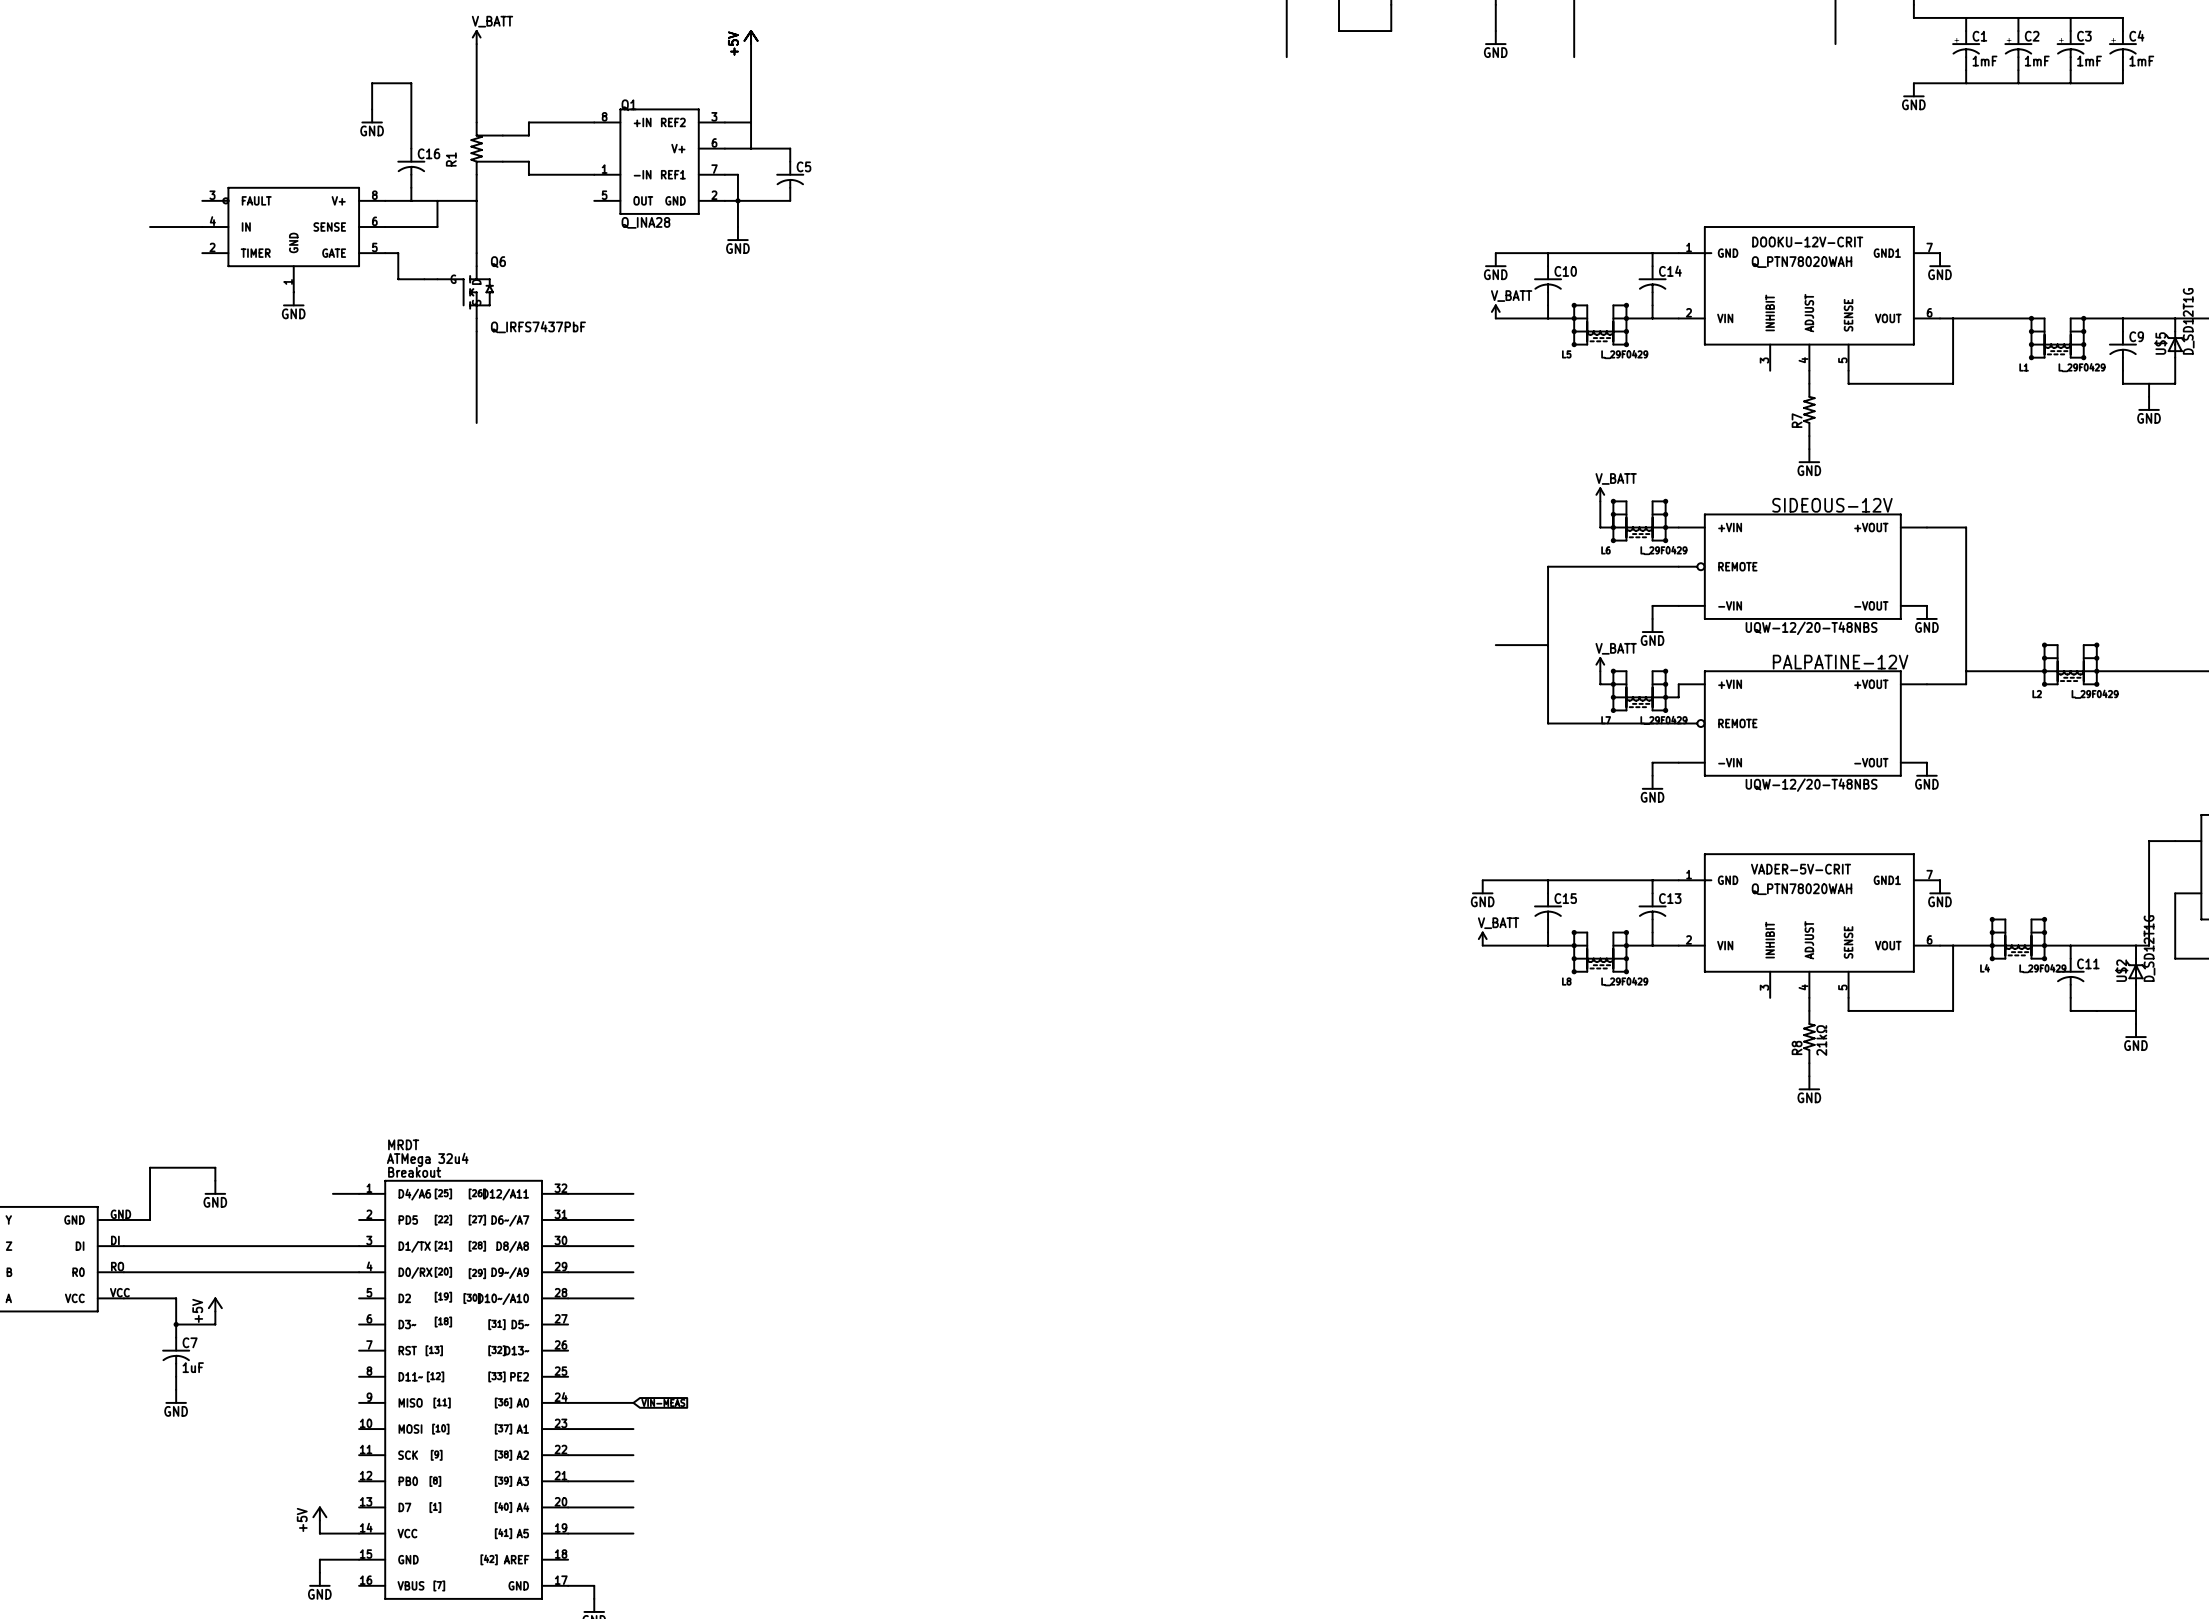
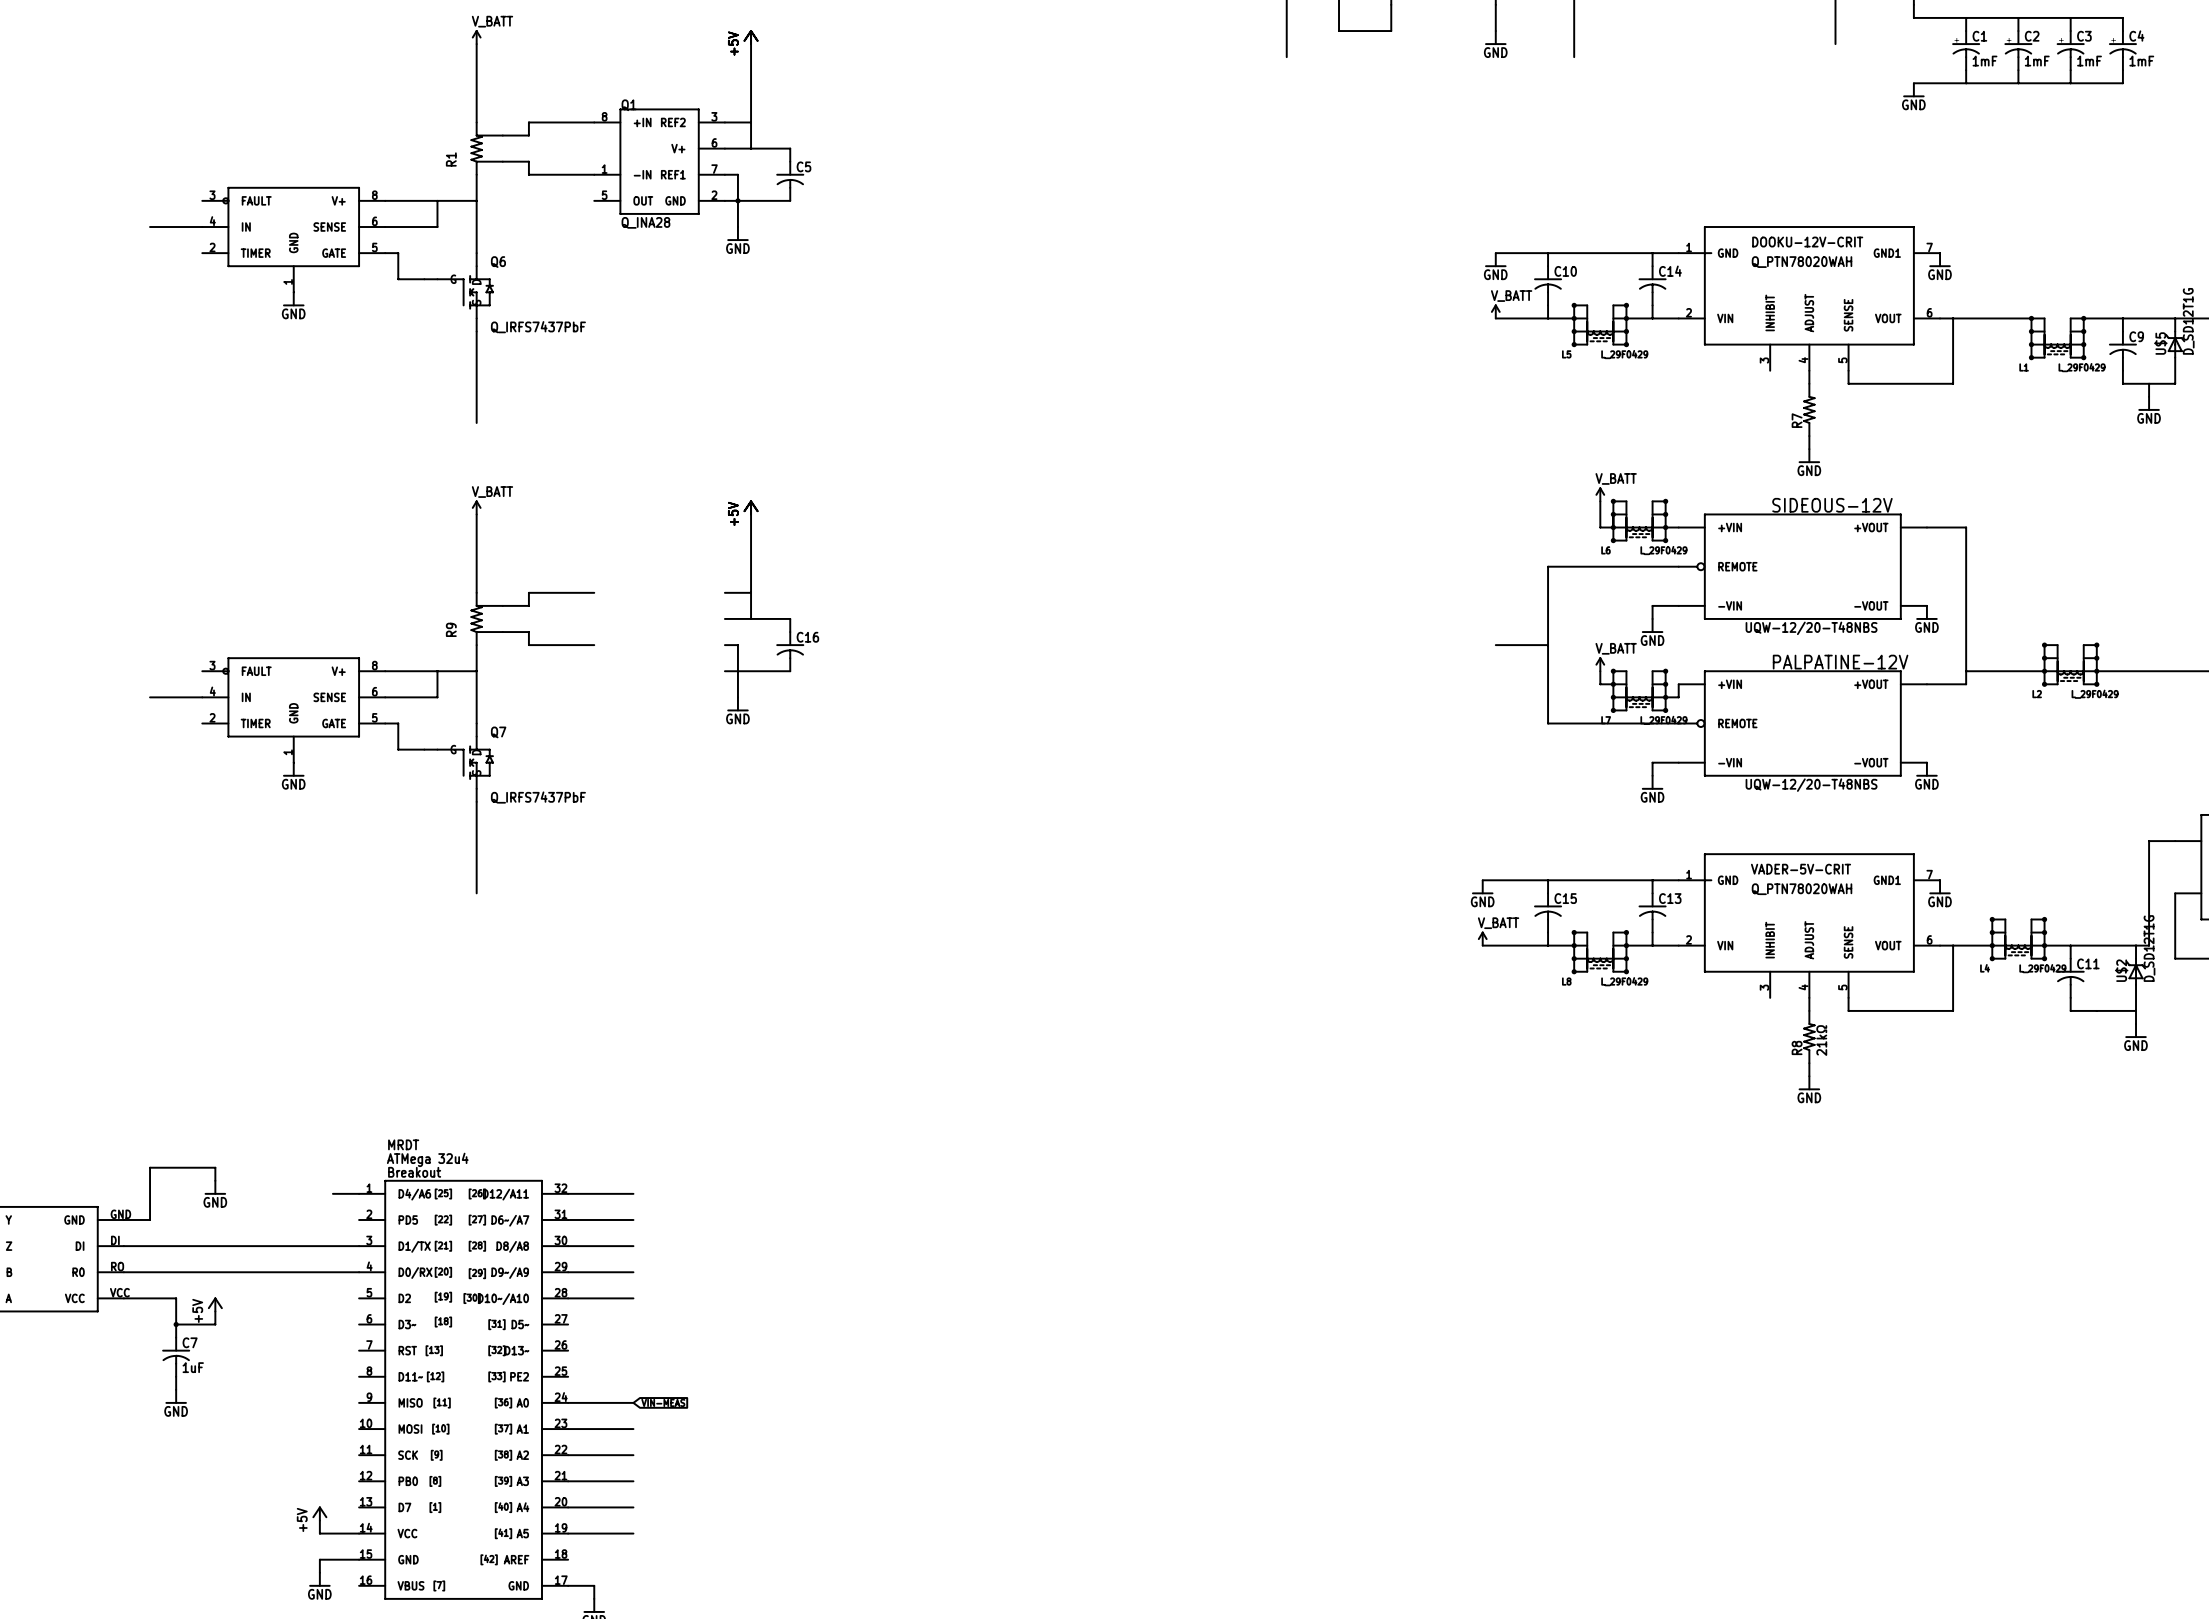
wire: (372, 109) (372, 83) (411, 83) (411, 148) -> none
power symbol: GND (372, 116) -> none
C16 position: (411, 168) -> (790, 651)
wire: (411, 187) (411, 200) -> none
power symbol: none -> V_BATT (476, 507)
power symbol: none -> +5V (751, 507)
wire: none -> (476, 514) (476, 592)
wire: none -> (751, 514) (751, 618)
wire: none -> (594, 592) (528, 592) (528, 605) (502, 605)
wire: none -> (724, 592) (751, 592)
R9: none -> (486, 618)
wire: none -> (724, 618) (790, 618) (790, 632)
wire: none -> (502, 632) (528, 632) (528, 645) (594, 645)
wire: none -> (476, 645) (476, 723)
wire: none -> (724, 645) (737, 645) (737, 697)
wire: none -> (385, 671) (476, 671)
wire: none -> (437, 671) (437, 697) (385, 697)
wire: none -> (724, 671) (790, 671)
wire: none -> (150, 697) (202, 697)
power symbol: none -> GND (737, 704)
part: none -> (293, 710)
wire: none -> (385, 723) (398, 723) (398, 749) (424, 749)
Q7: none -> Q_IRFS7437PbF (459, 762)
power symbol: none -> GND (293, 769)
wire: none -> (476, 801) (476, 893)

